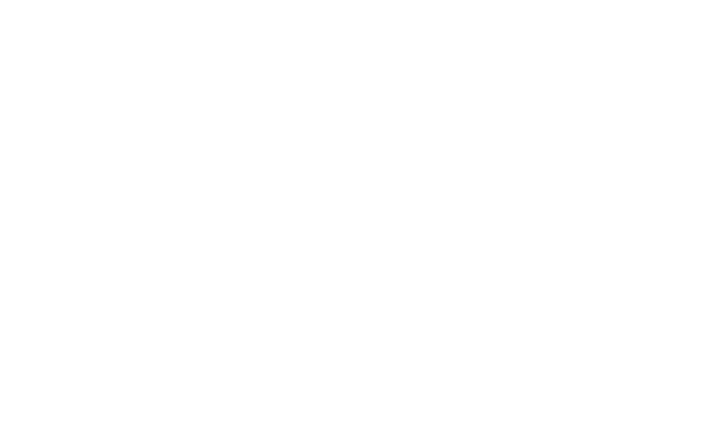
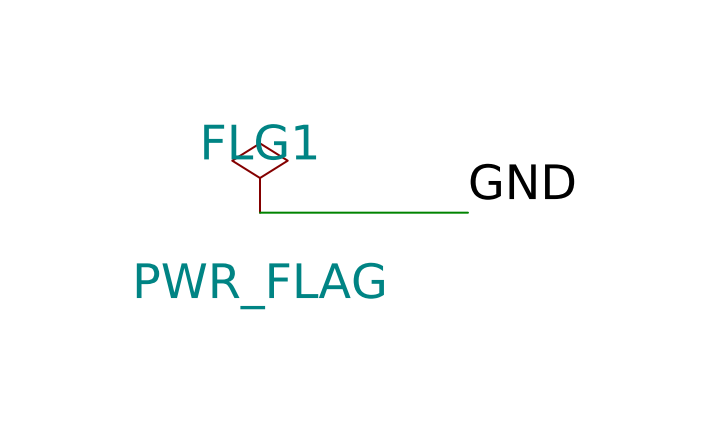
FLG1: none -> PWR_FLAG (259, 178)
label: none -> GND (522, 181)
wire: none -> (259, 212) (467, 212)

